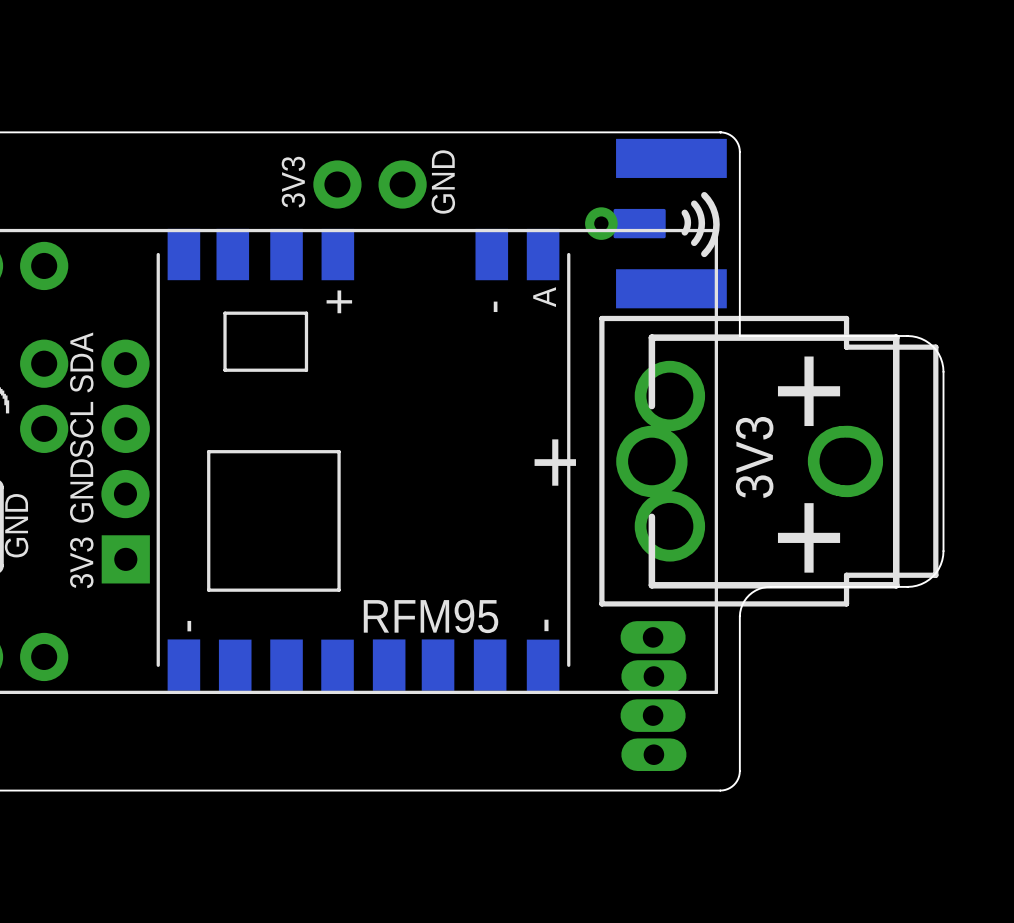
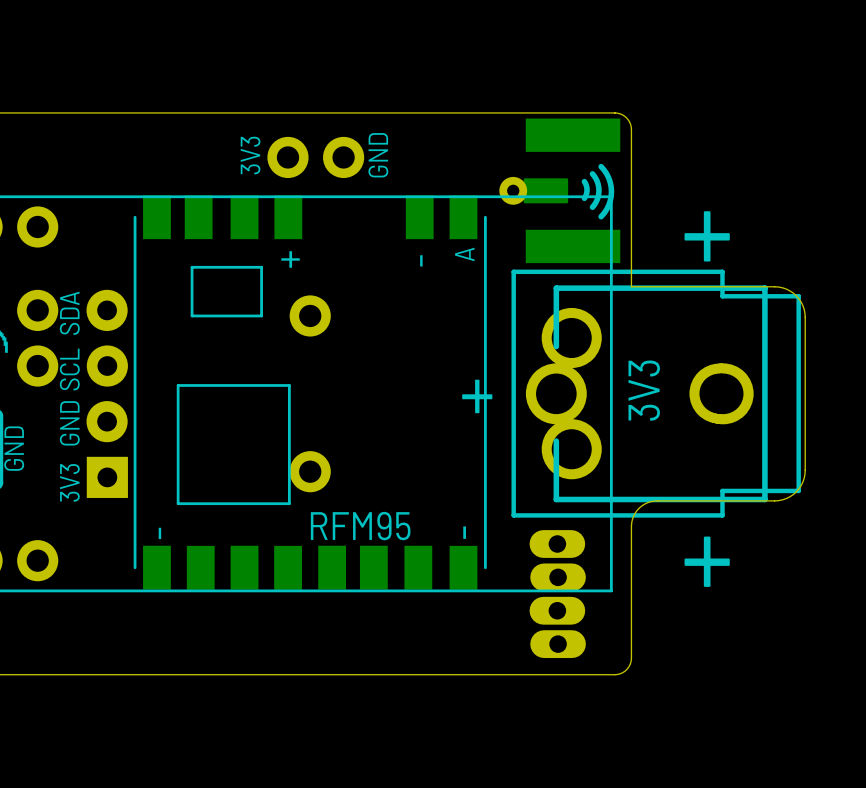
part: none -> (310, 315)
text position: + (809, 391) -> + (707, 236)
text position: + (809, 537) -> + (707, 561)
part: none -> (310, 471)

